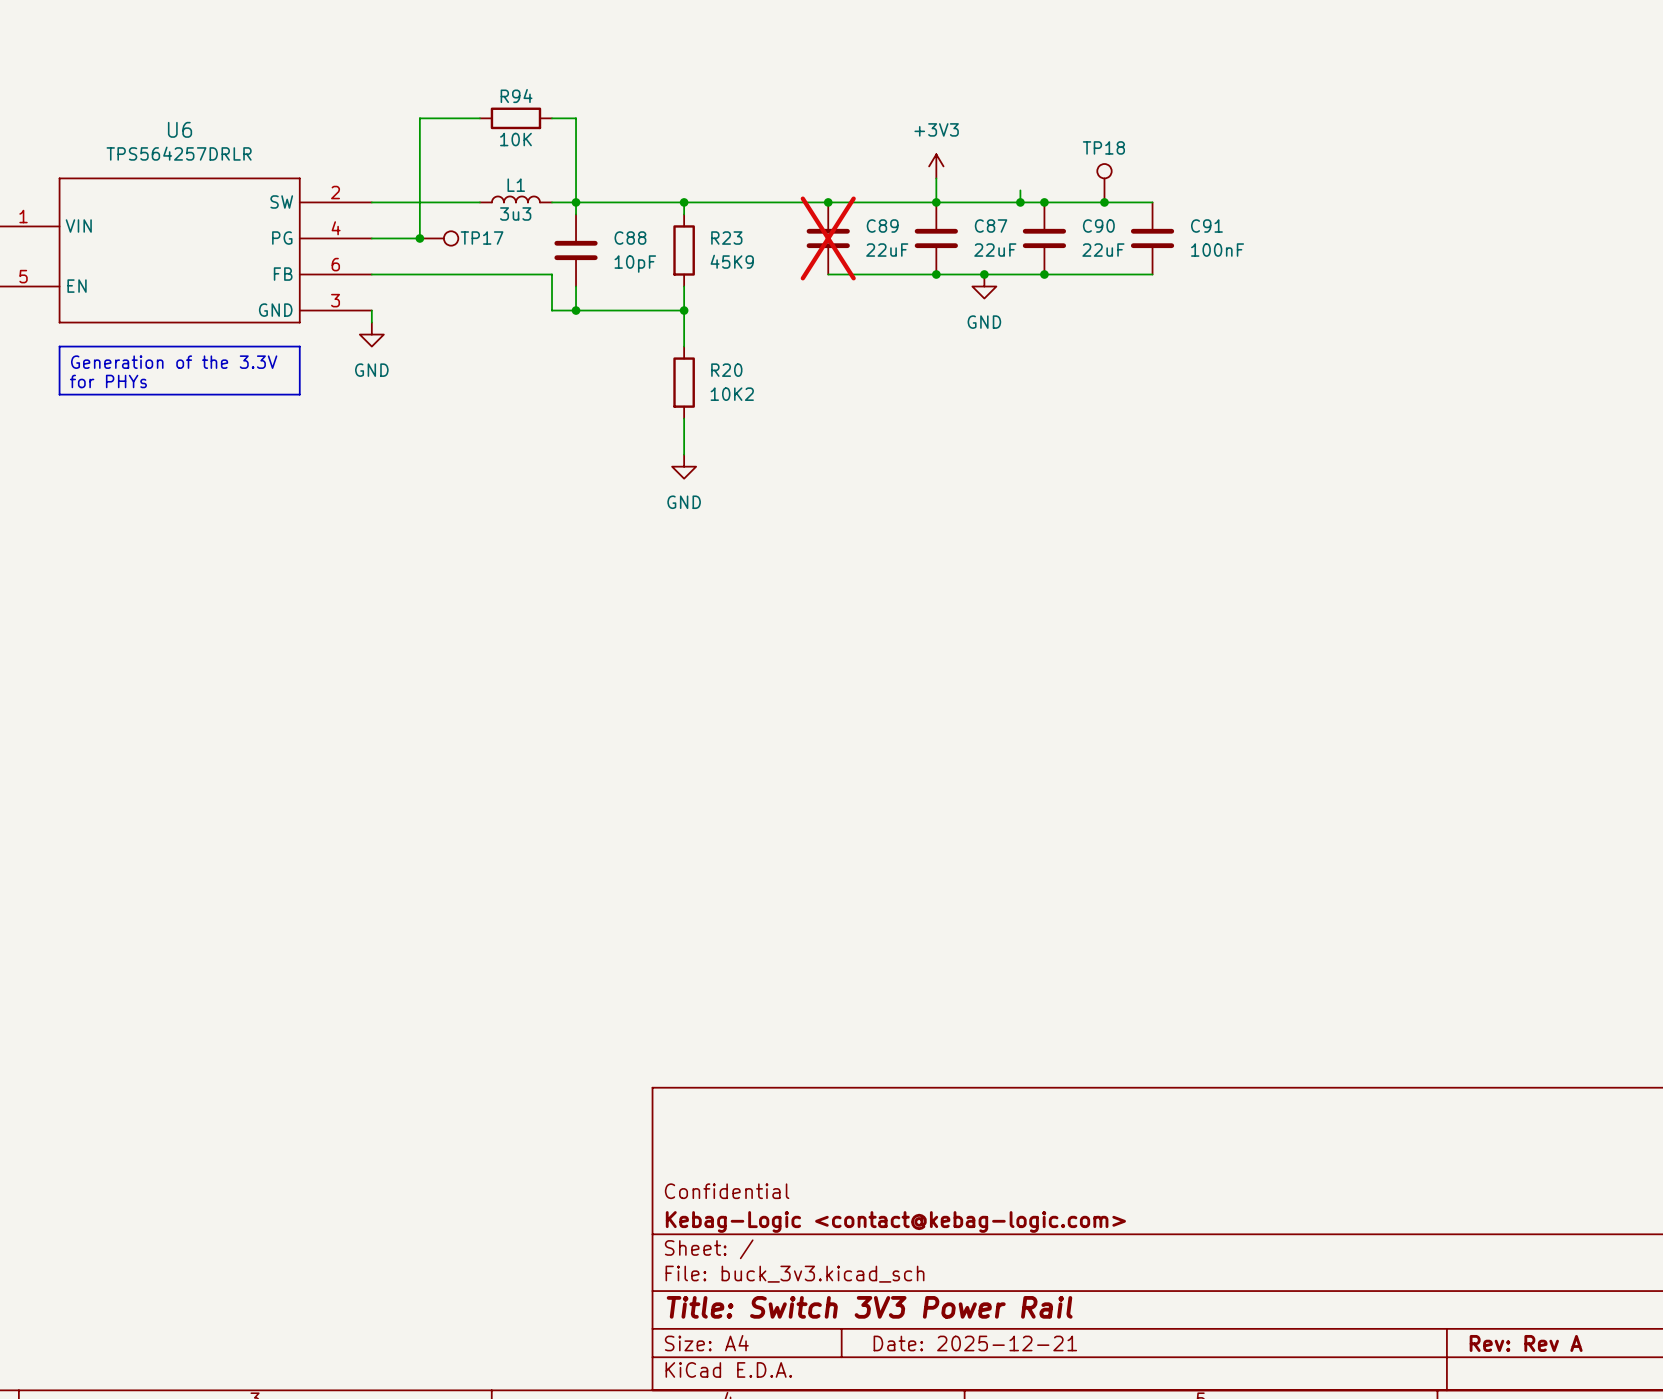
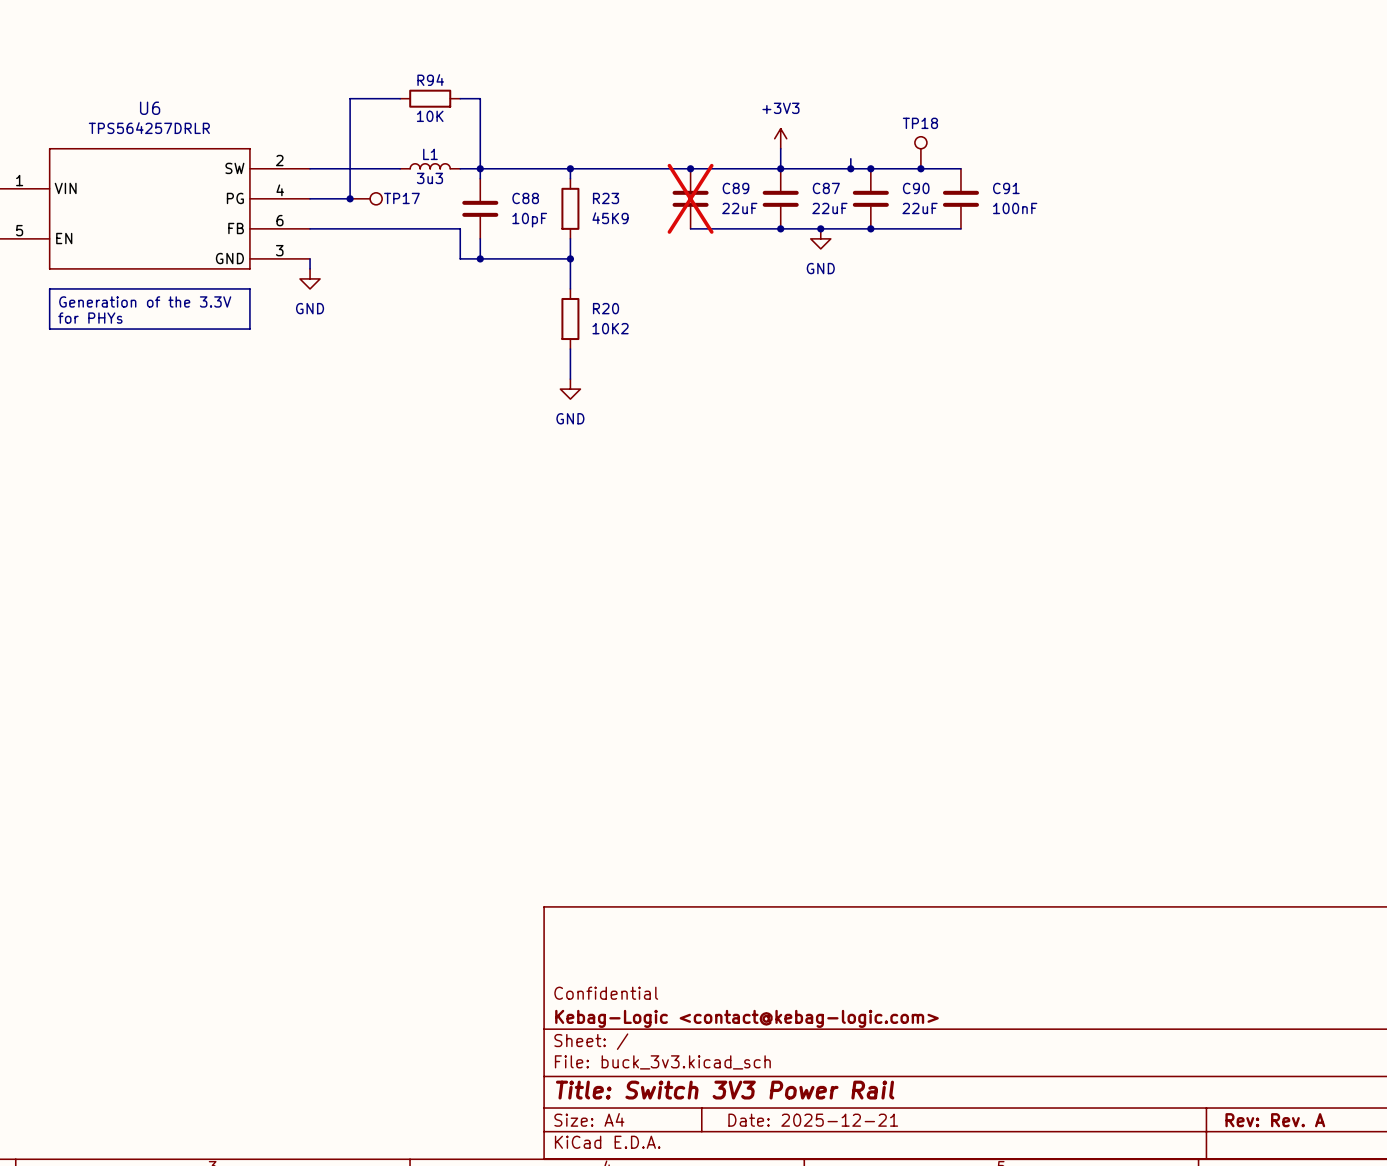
title block: Rev: Rev A (1526, 1343) -> Rev: Rev. A (1275, 1120)

